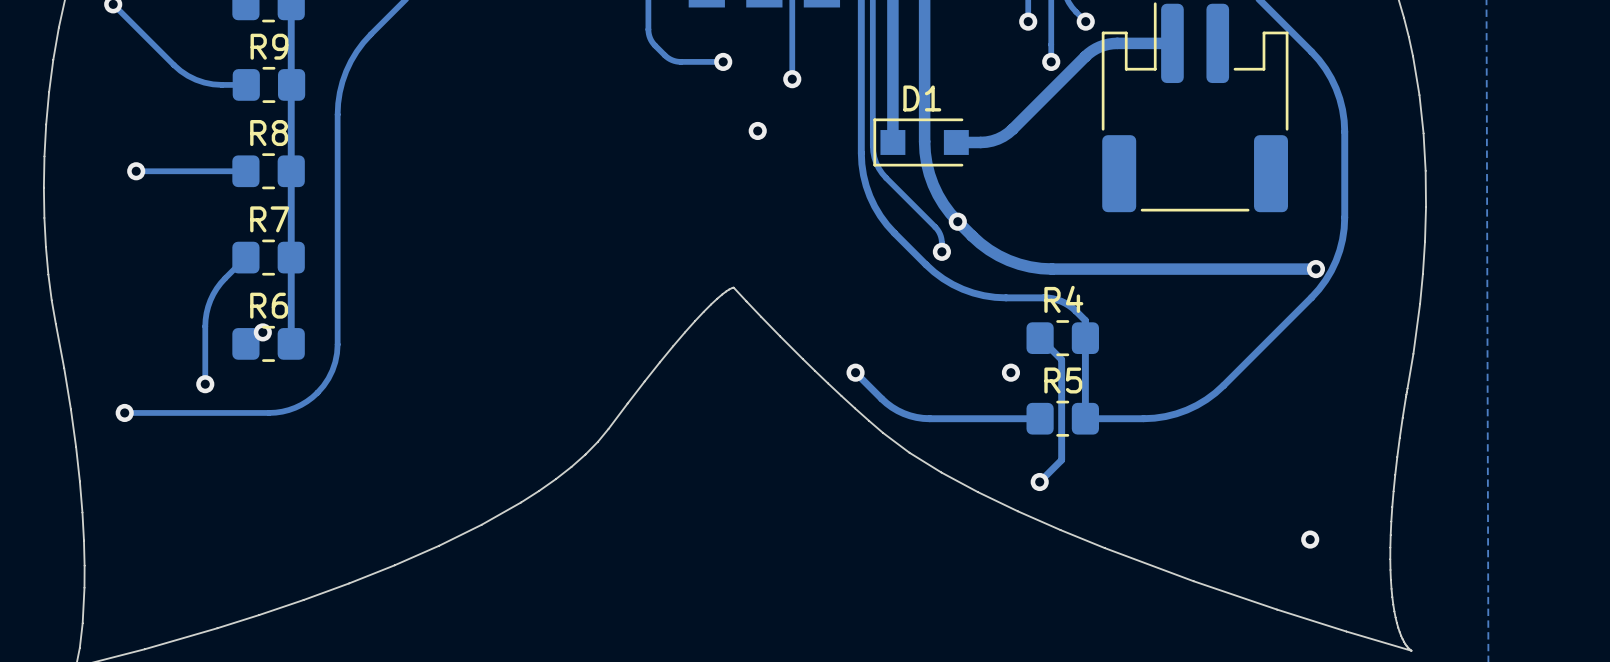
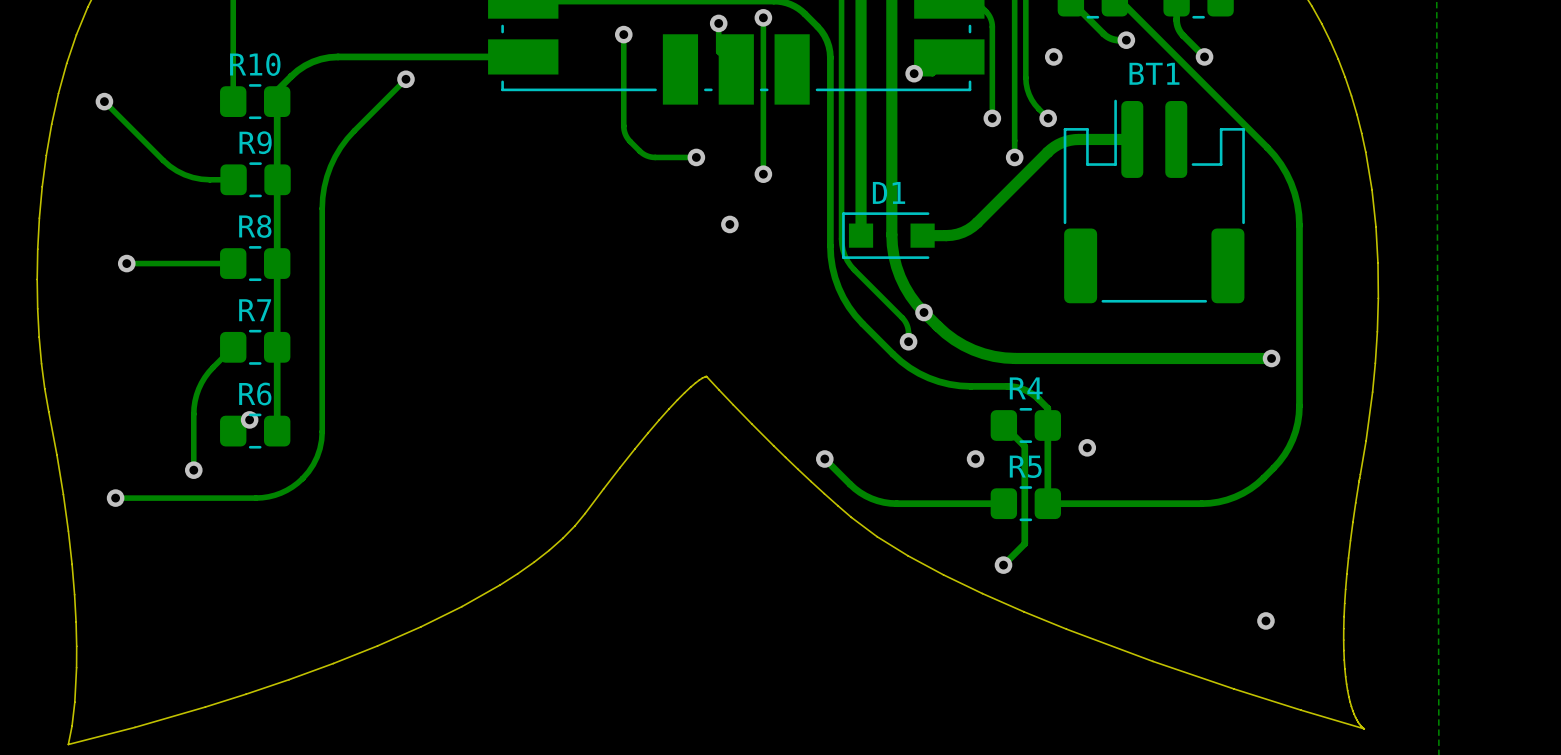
track: (1344, 217) (1342, 239) (1336, 260) (1325, 280) (1311, 297) (1223, 385) (1206, 399) (1176, 413) (1143, 418) -> (1299, 308) (1297, 422) (1292, 439) (1284, 454) (1263, 477) (1243, 493) (1218, 501) (1104, 503)
via: none -> (1087, 447)

